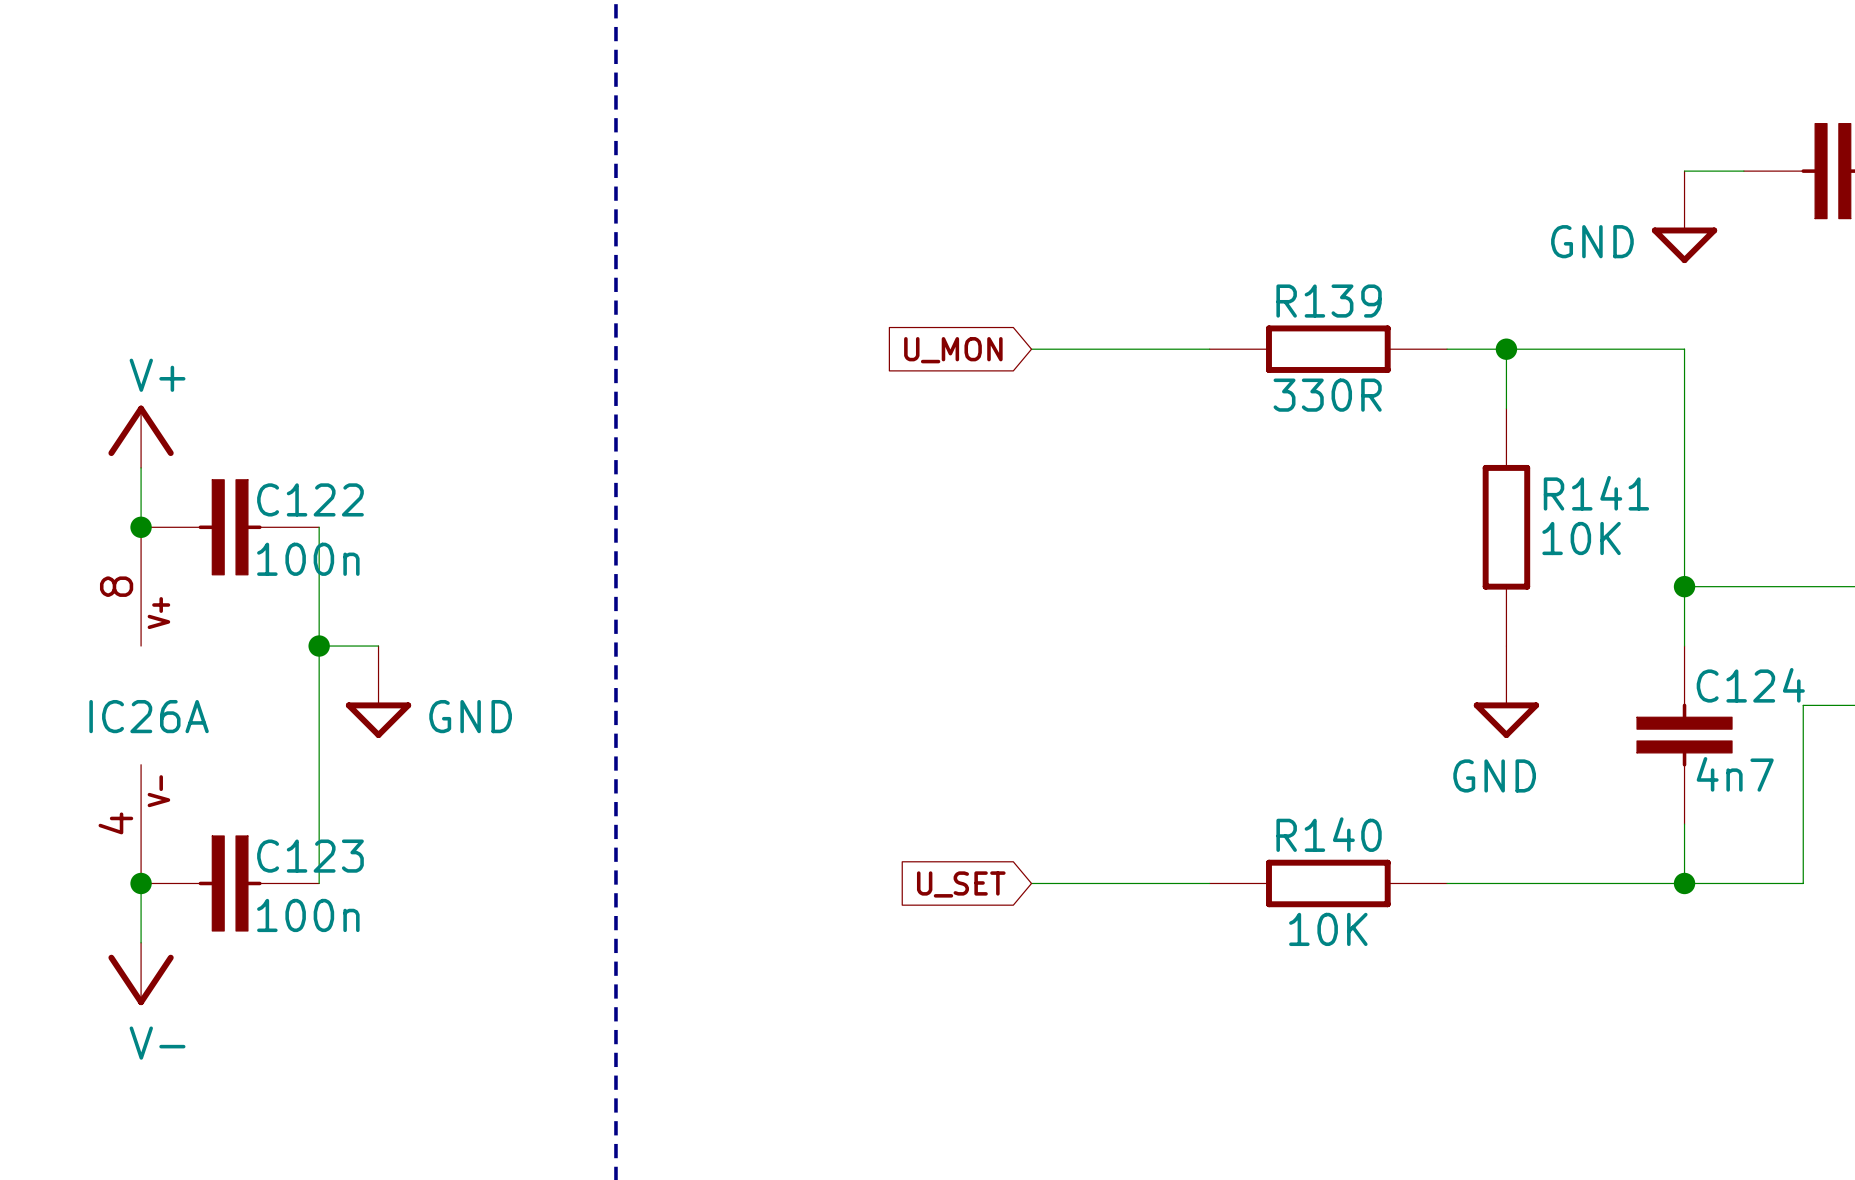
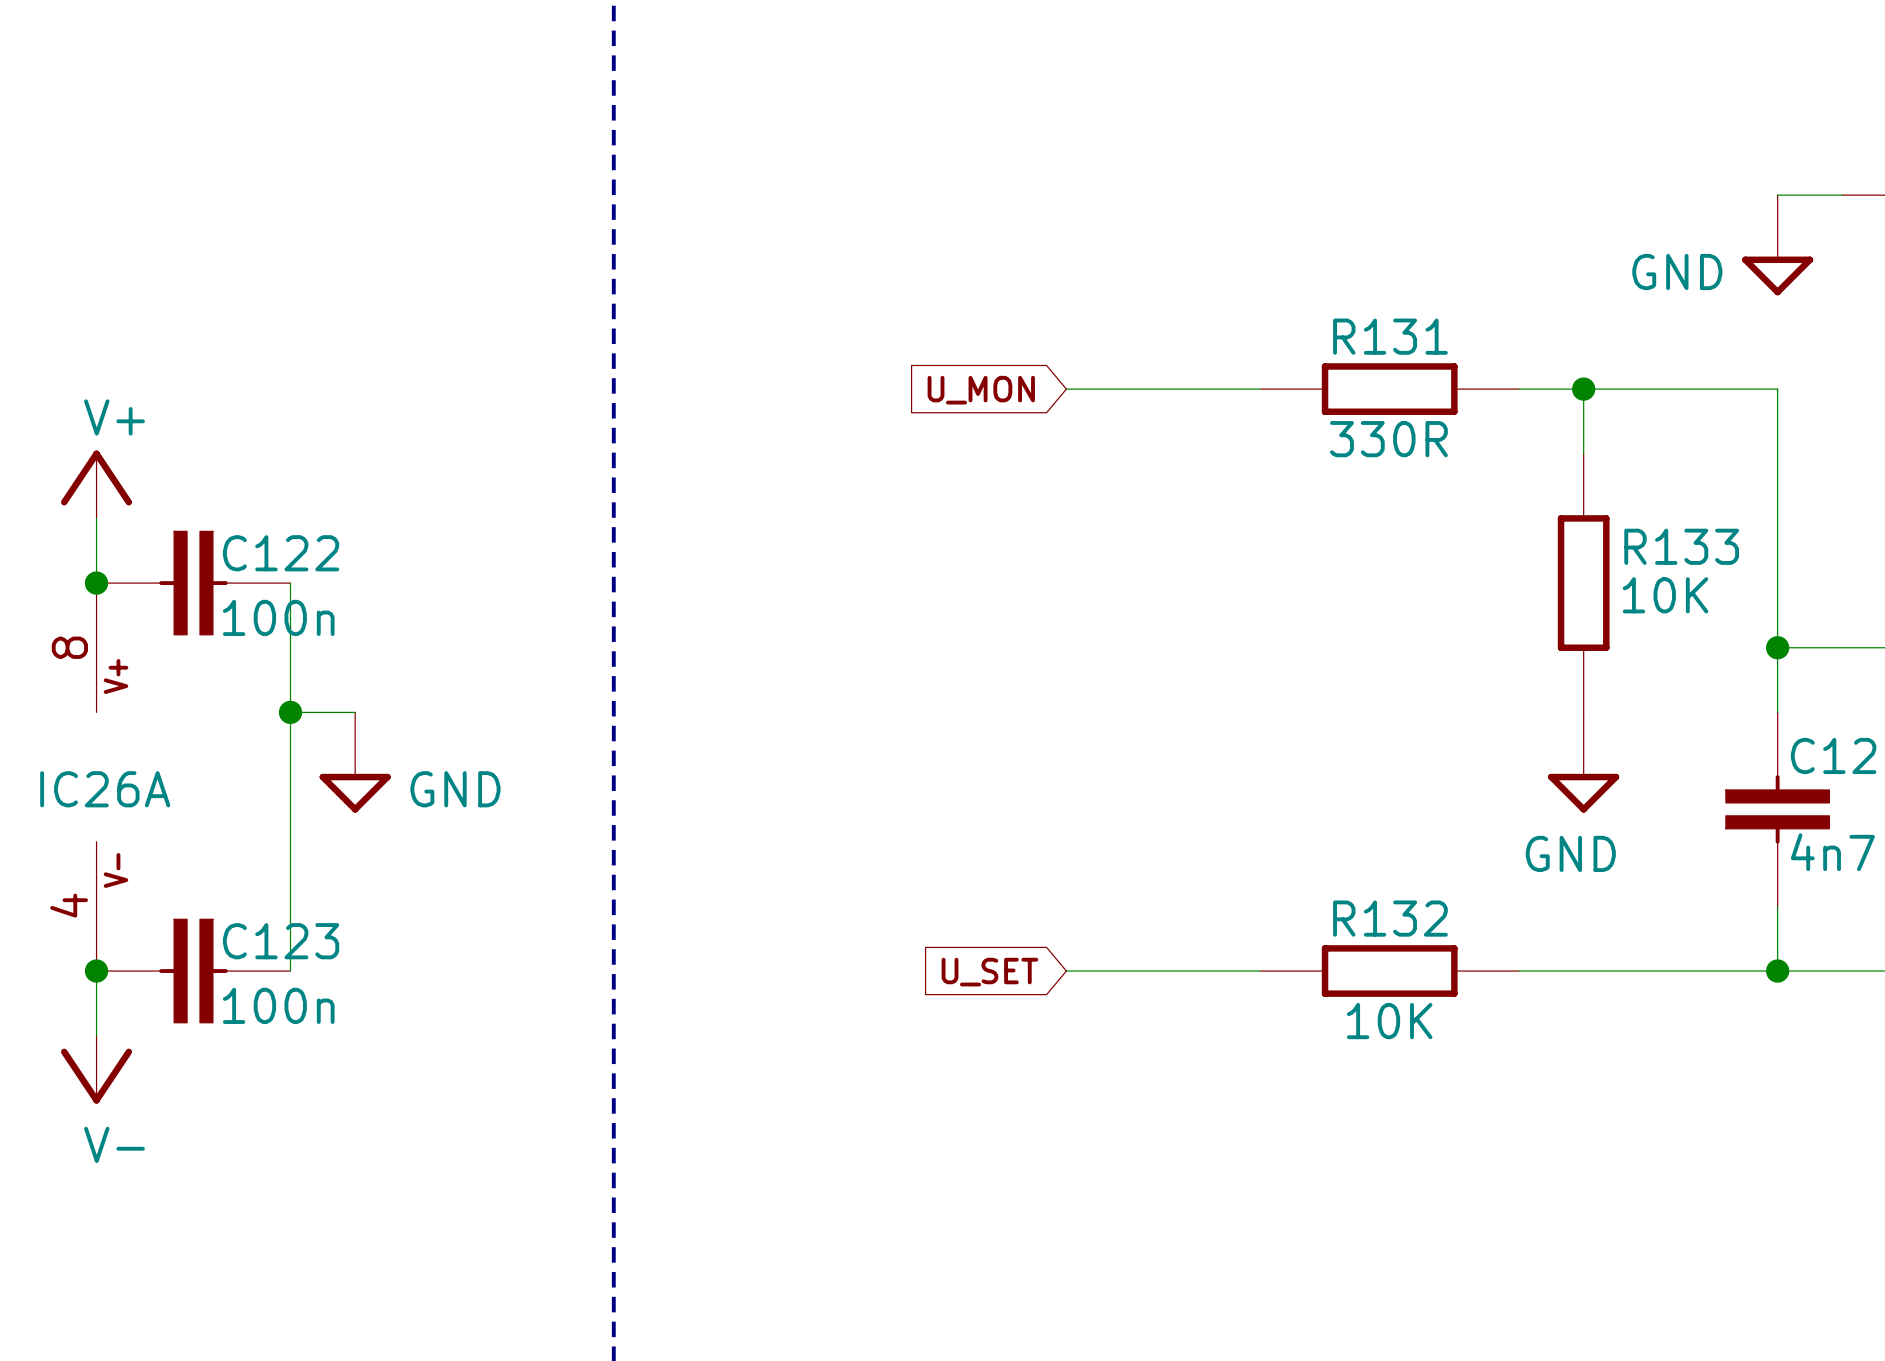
R139 name: R139 (1329, 301) -> R131 (1390, 336)
R141 name: R141 (1596, 493) -> R133 (1681, 546)
R140 name: R140 (1329, 834) -> R132 (1390, 918)

